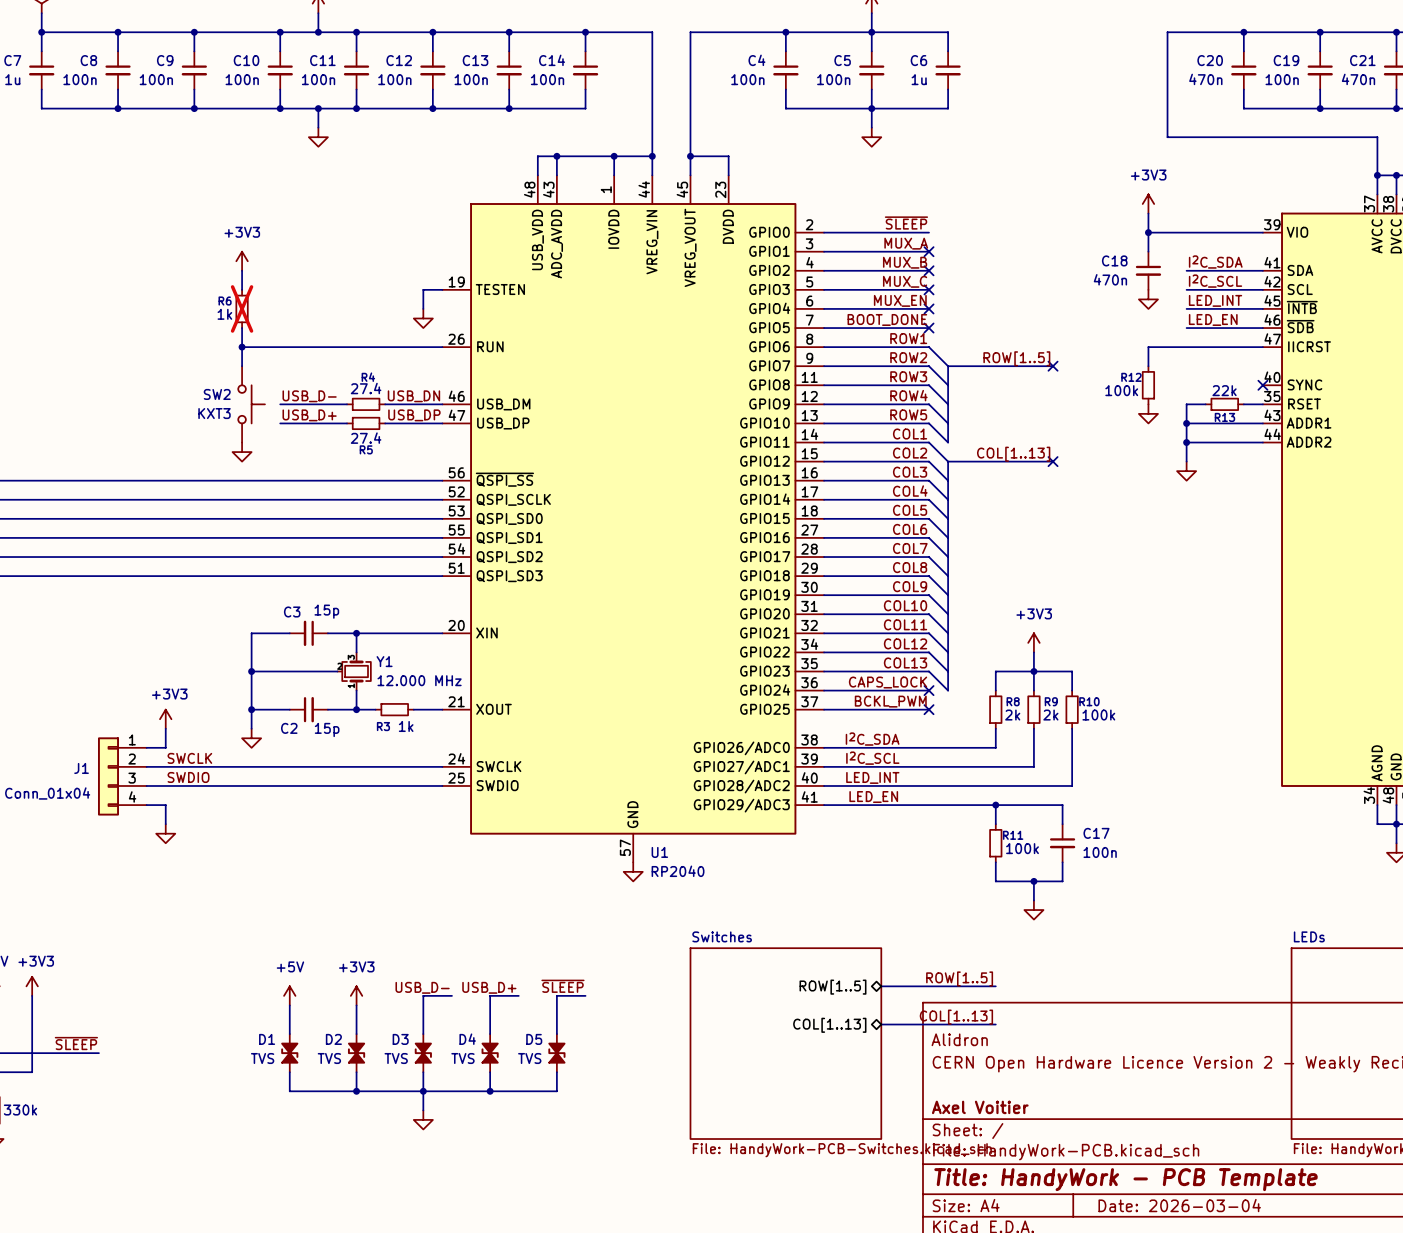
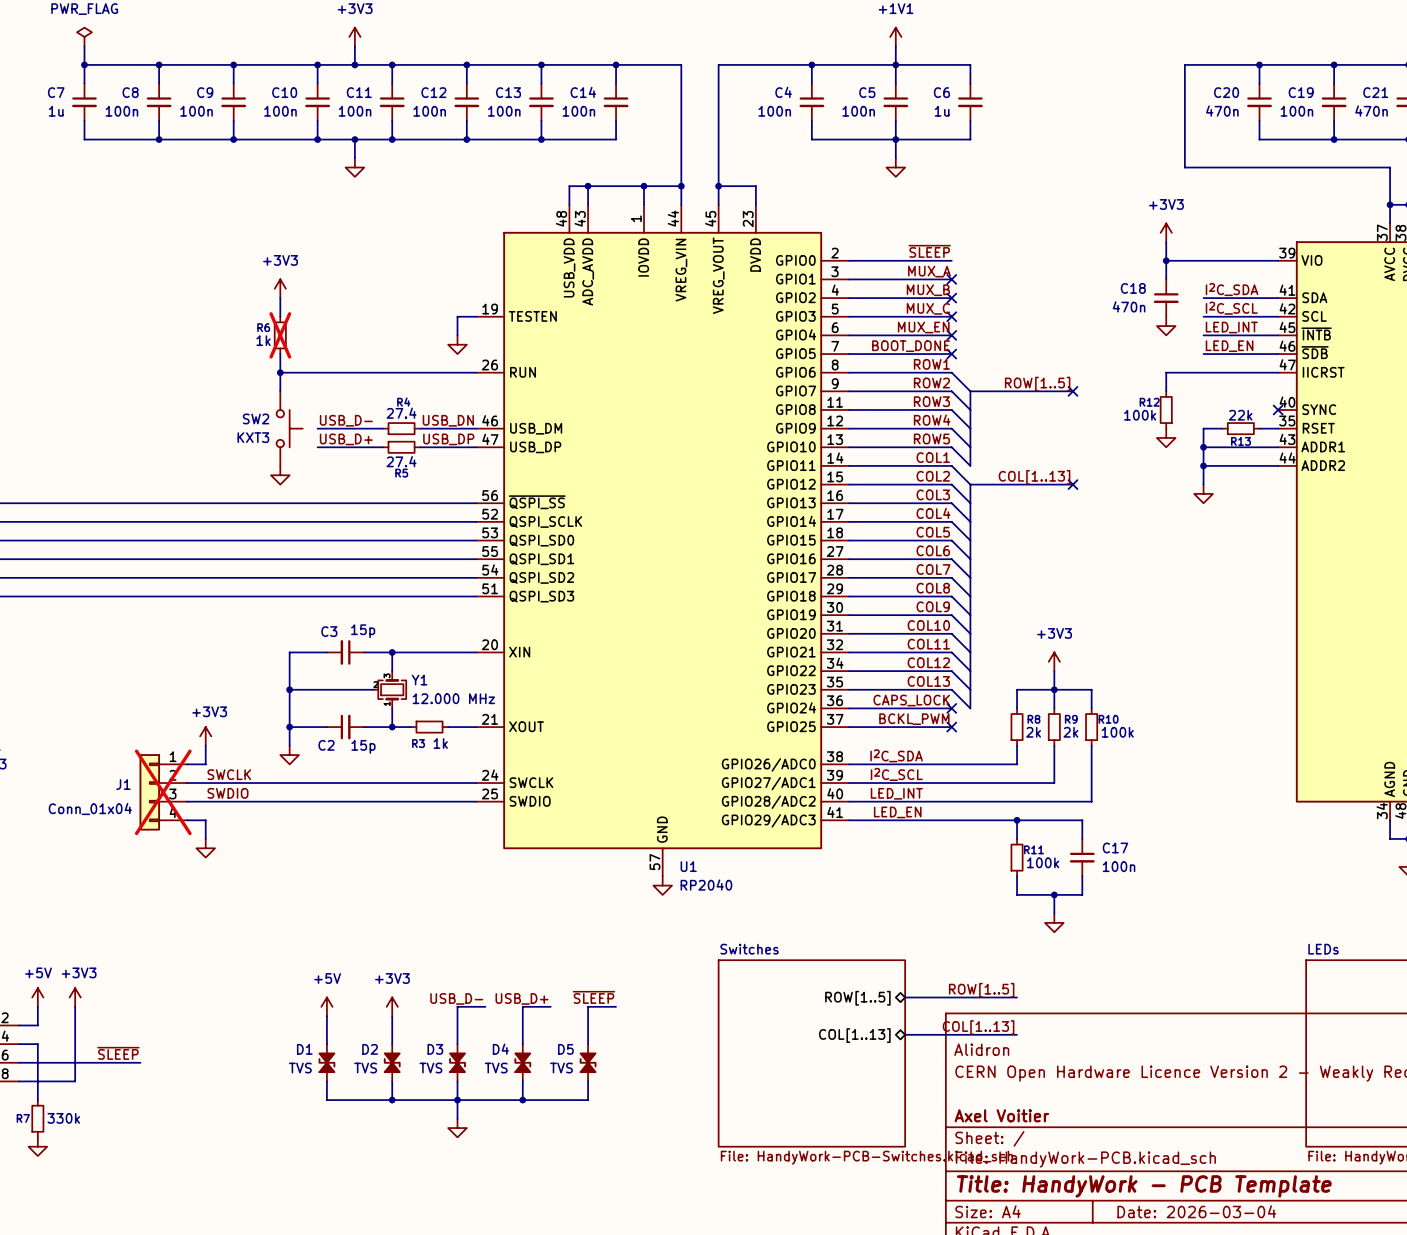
J1 do-not-place cross: none -> (163, 792)

